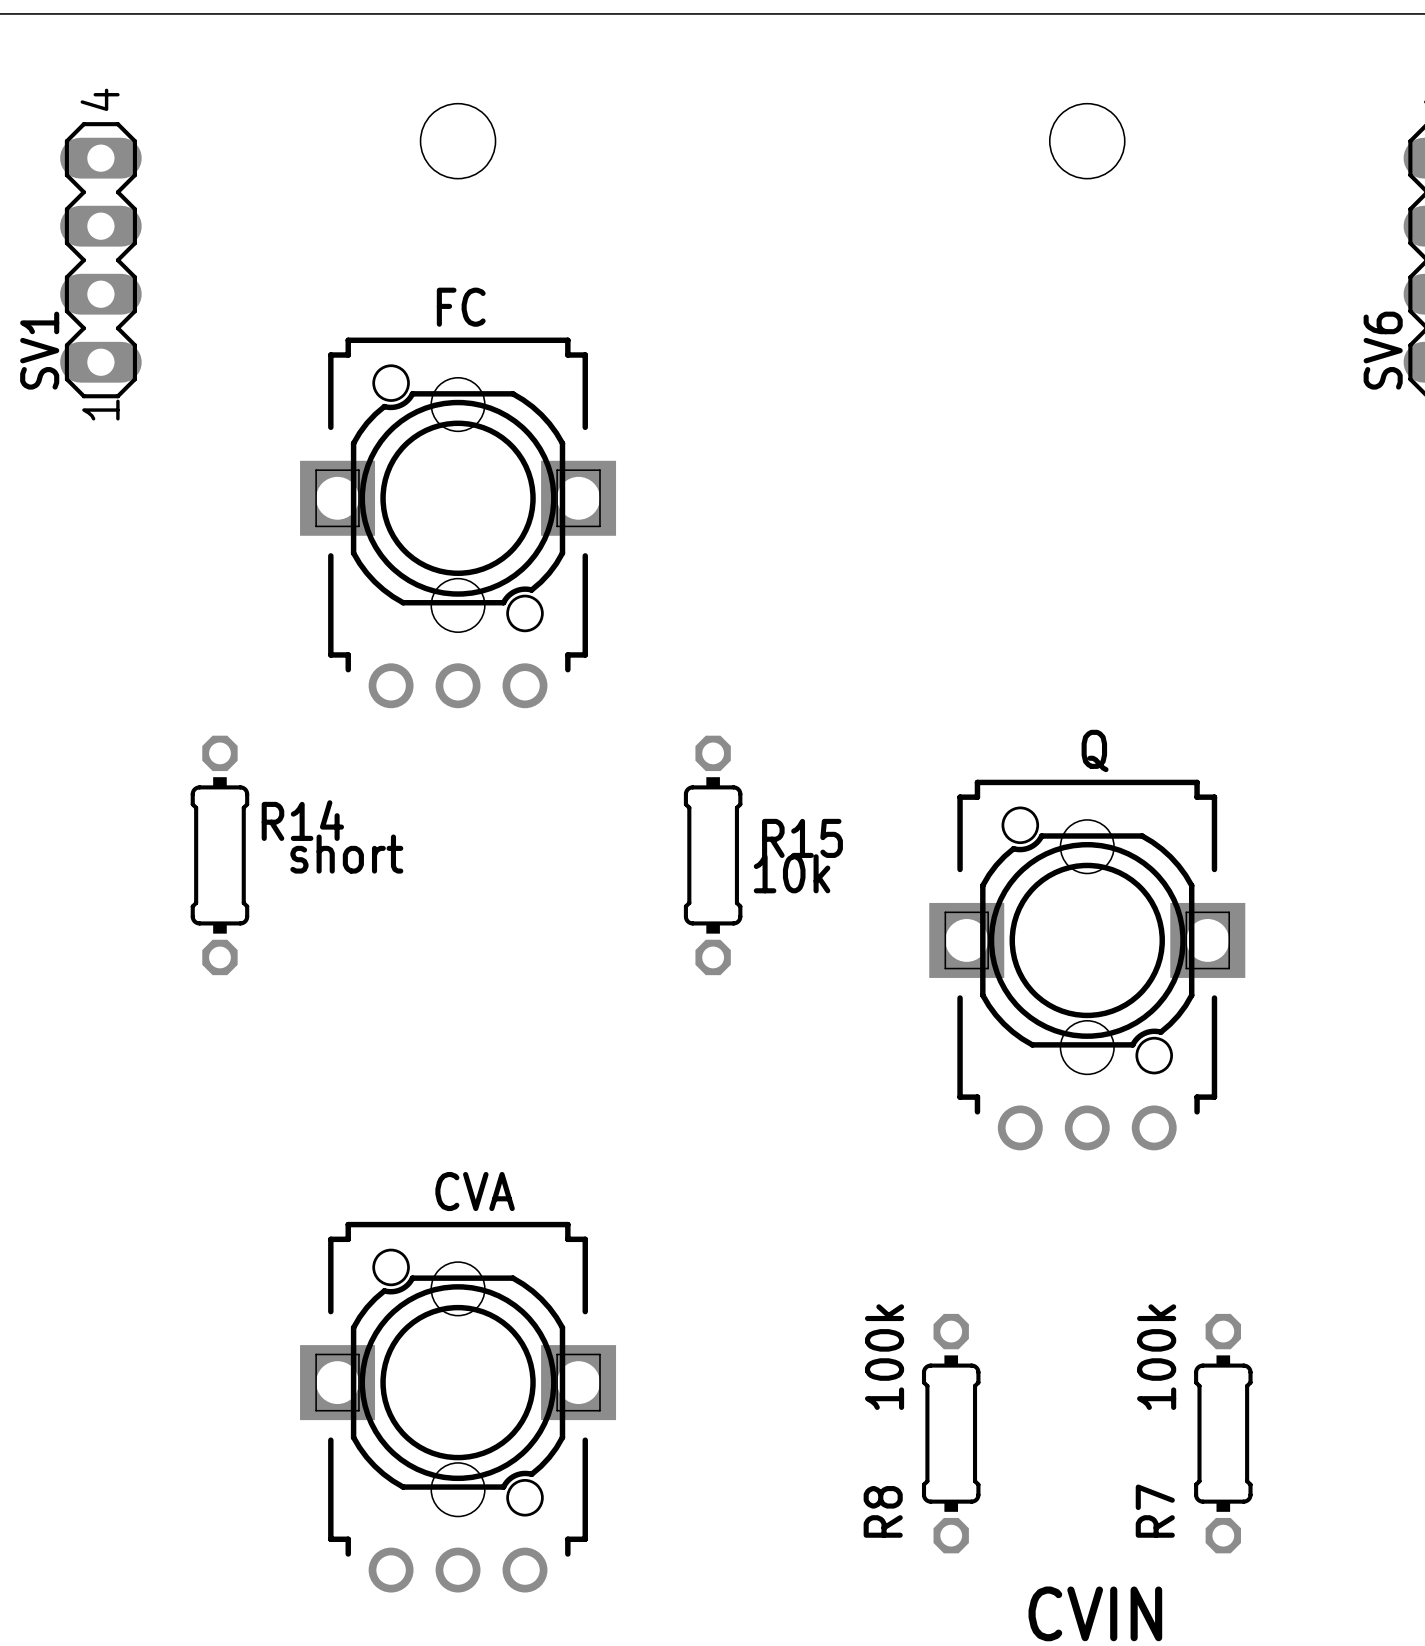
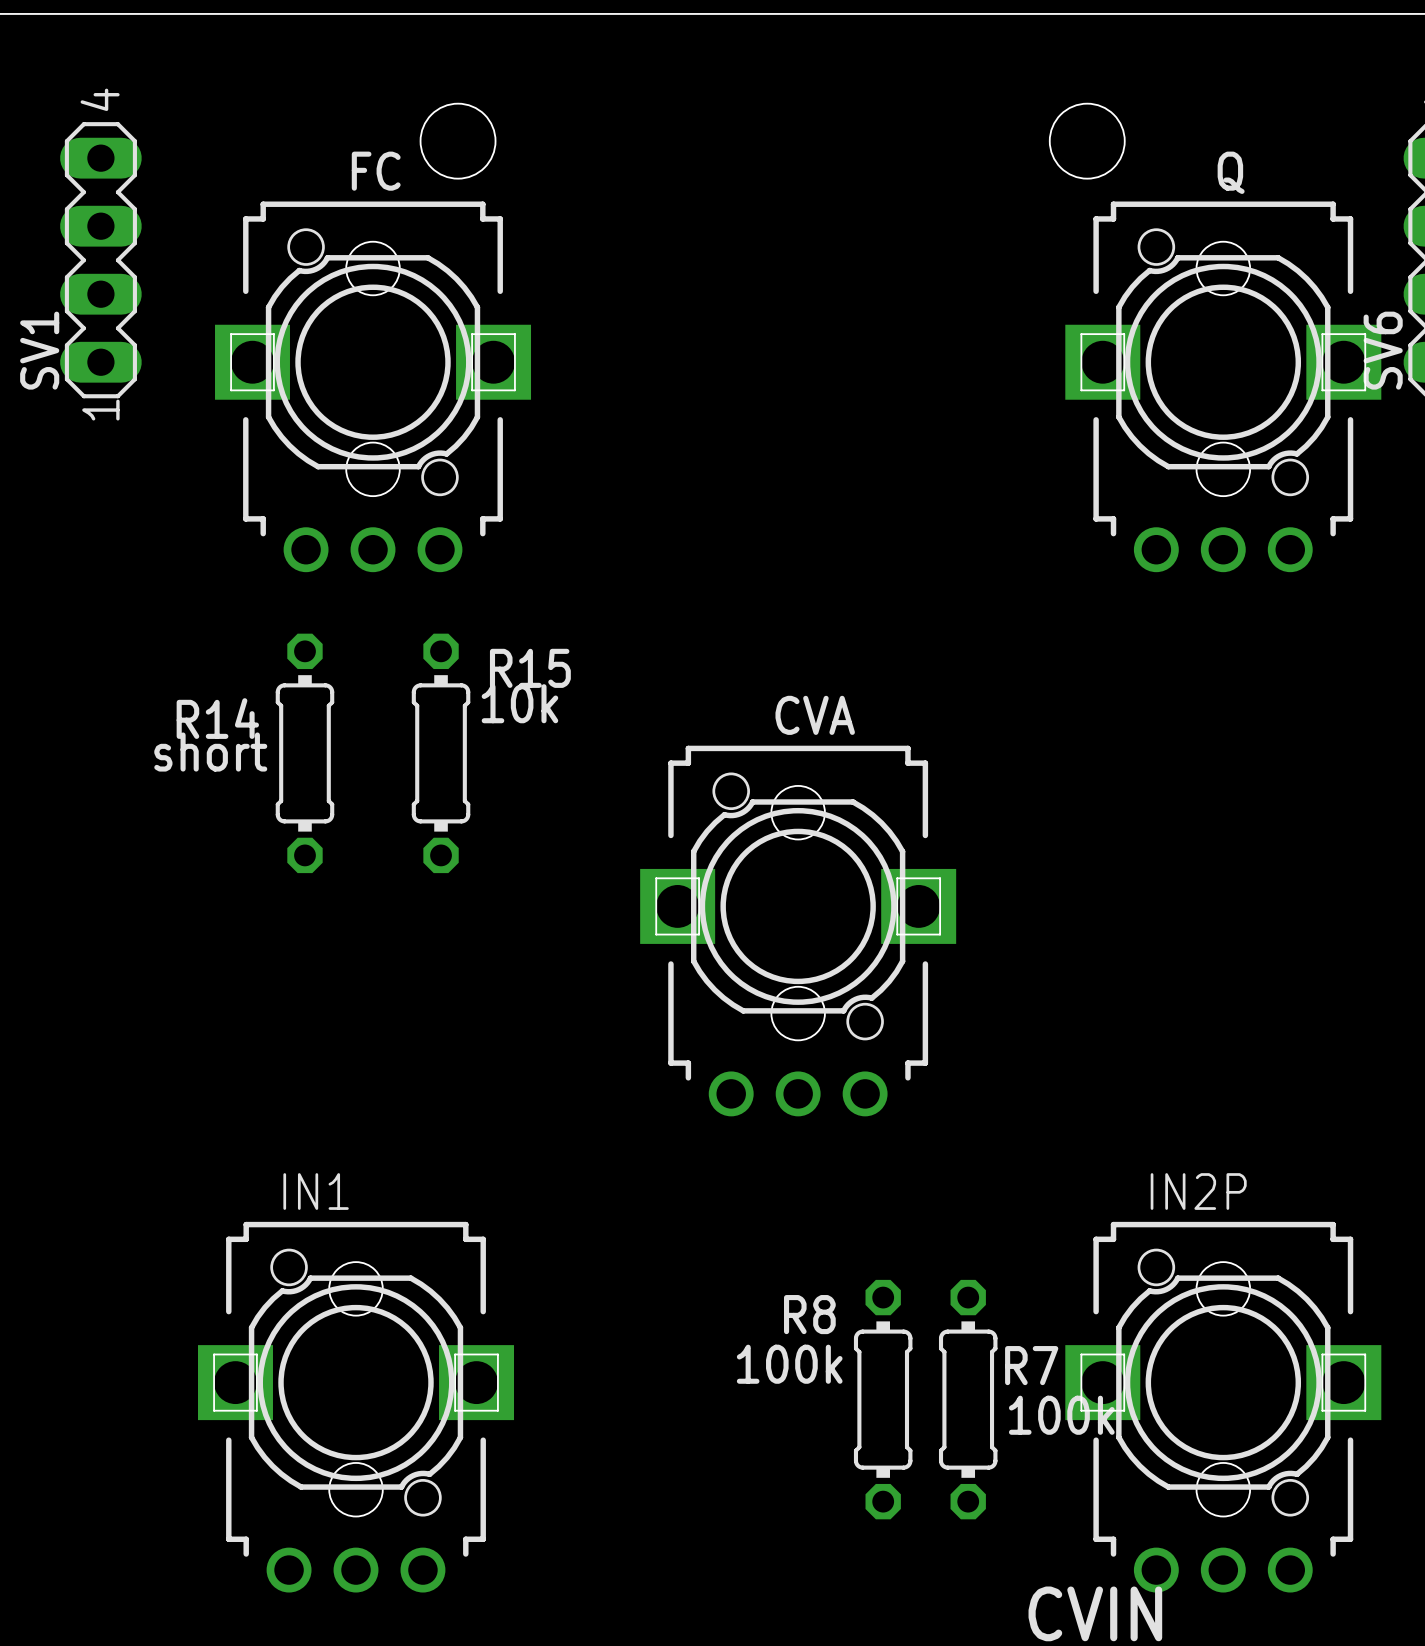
FC position: (458, 522) -> (373, 386)
R14 name position: R14 (302, 820) -> R14 (217, 718)
R15 name position: R15 (802, 838) -> R15 (530, 668)
R14 value position: short (346, 854) -> short (210, 752)
R14 position: (219, 855) -> (304, 753)
R15 position: (713, 855) -> (441, 753)
R15 value position: 10k (792, 873) -> 10k (519, 703)
Q position: (1087, 965) -> (1223, 386)
R8 value rotation: 0° (884, 1357) -> 90° clockwise (789, 1364)
R7 value rotation: 0° (1156, 1357) -> 90° clockwise (1061, 1415)
IN1: none -> (356, 1407)
CVA position: (458, 1407) -> (798, 931)
IN2P: none -> (1223, 1407)
R8 position: (951, 1433) -> (883, 1399)
R7 position: (1223, 1433) -> (968, 1399)
R8 name rotation: 0° (883, 1511) -> 90° clockwise (809, 1314)
R8 name position: R8 (883, 1511) -> R8 (809, 1314)
R7 name rotation: 0° (1155, 1511) -> 90° clockwise (1031, 1365)
R7 name position: R7 (1155, 1511) -> R7 (1031, 1365)

